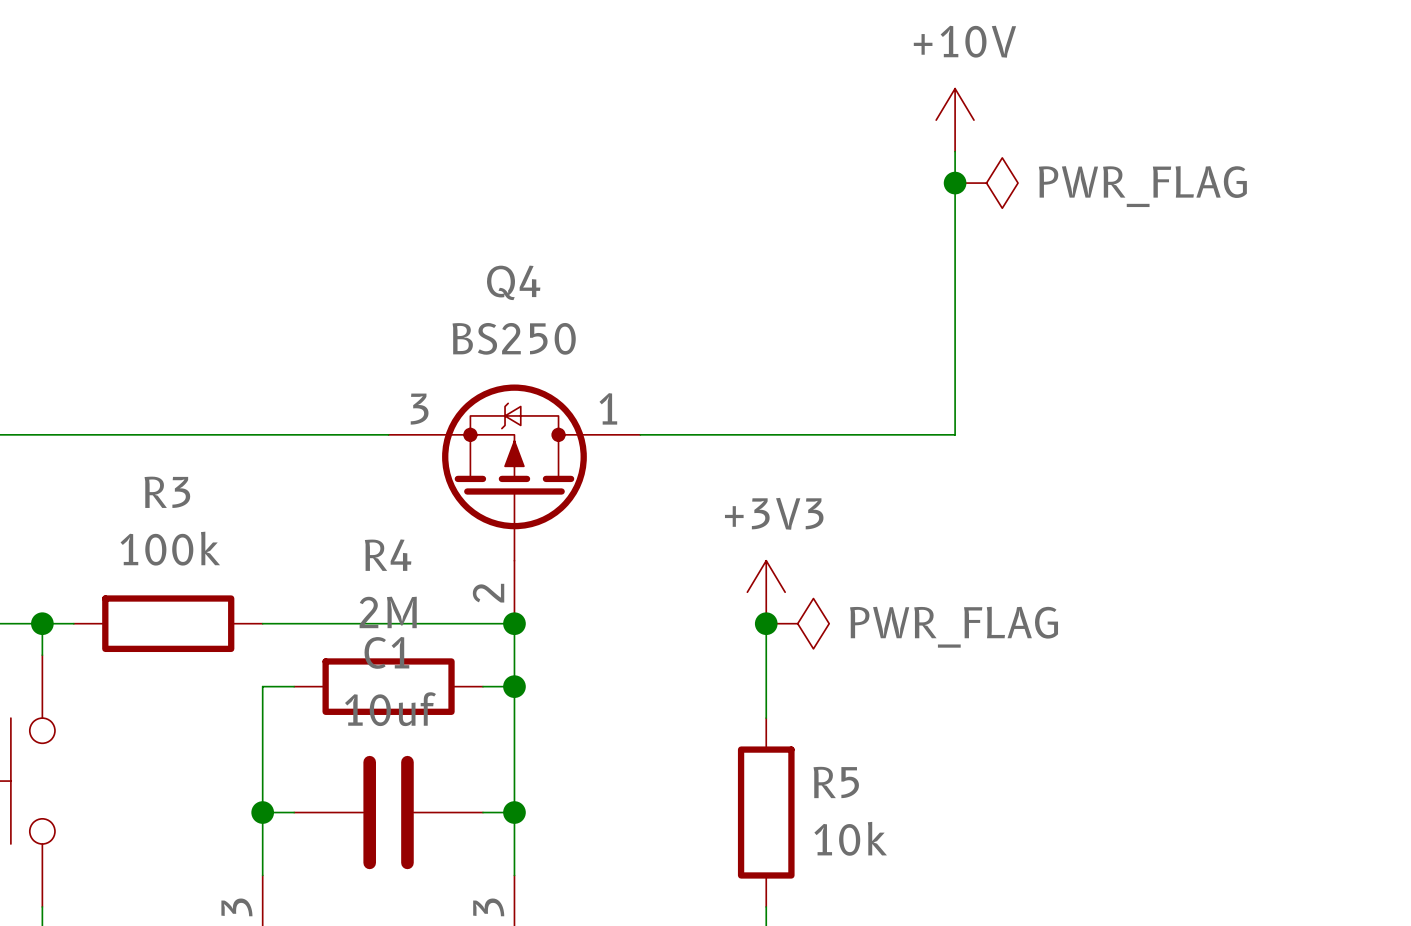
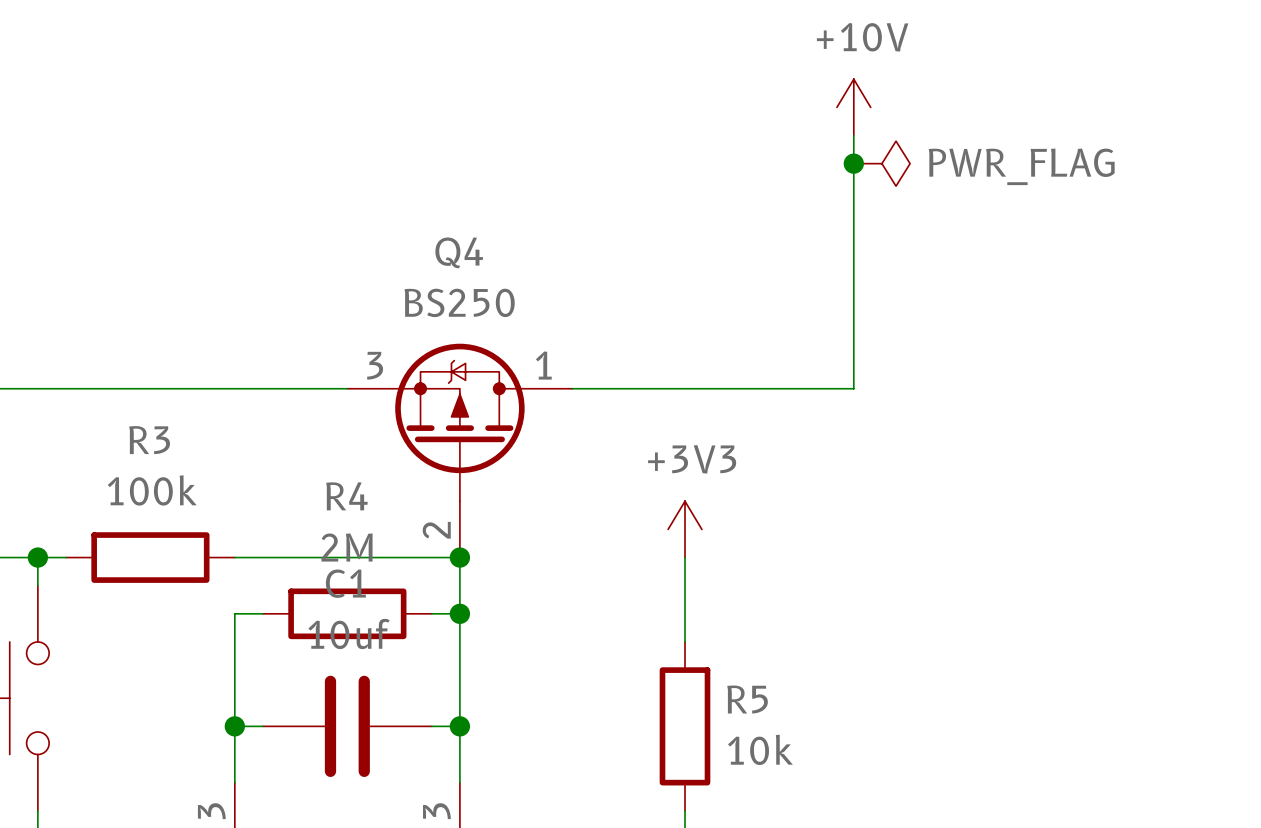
junction: (766, 623) -> none
power symbol: PWR_FLAG (797, 623) -> none

